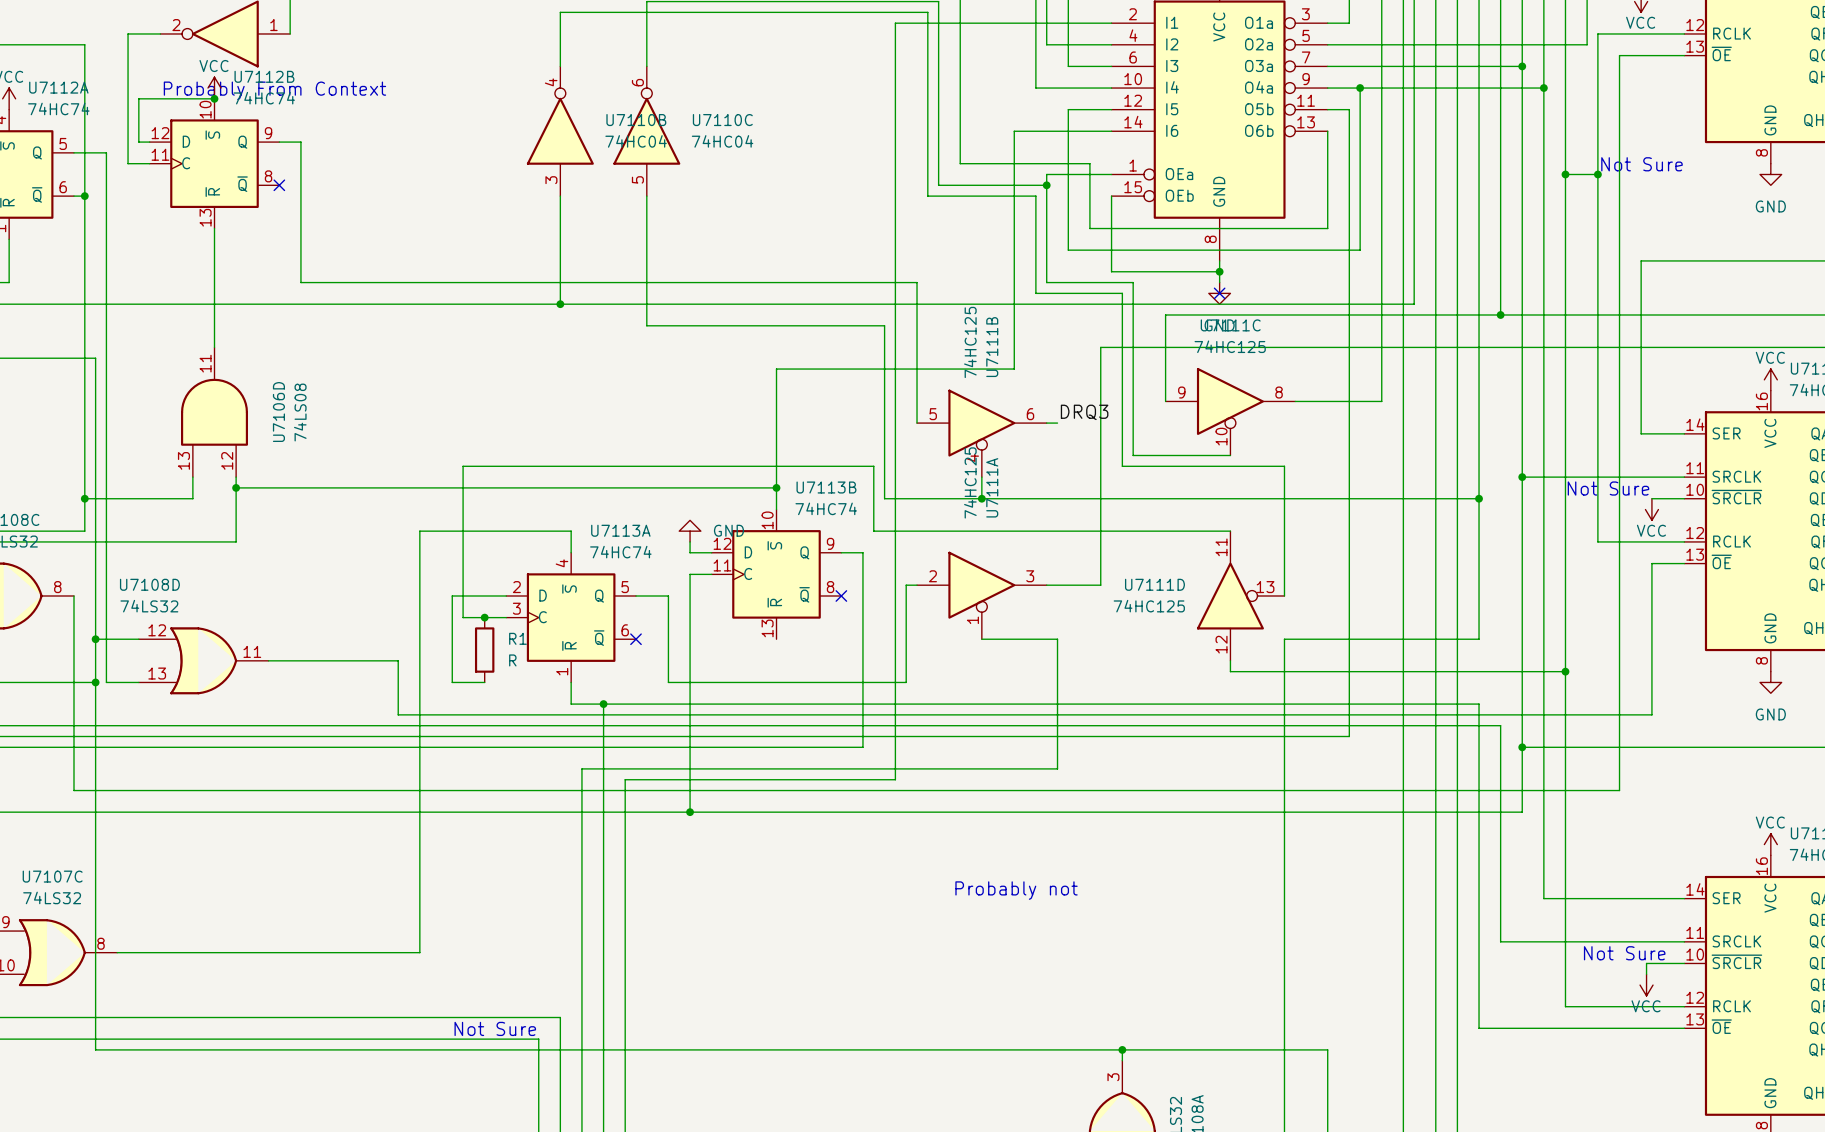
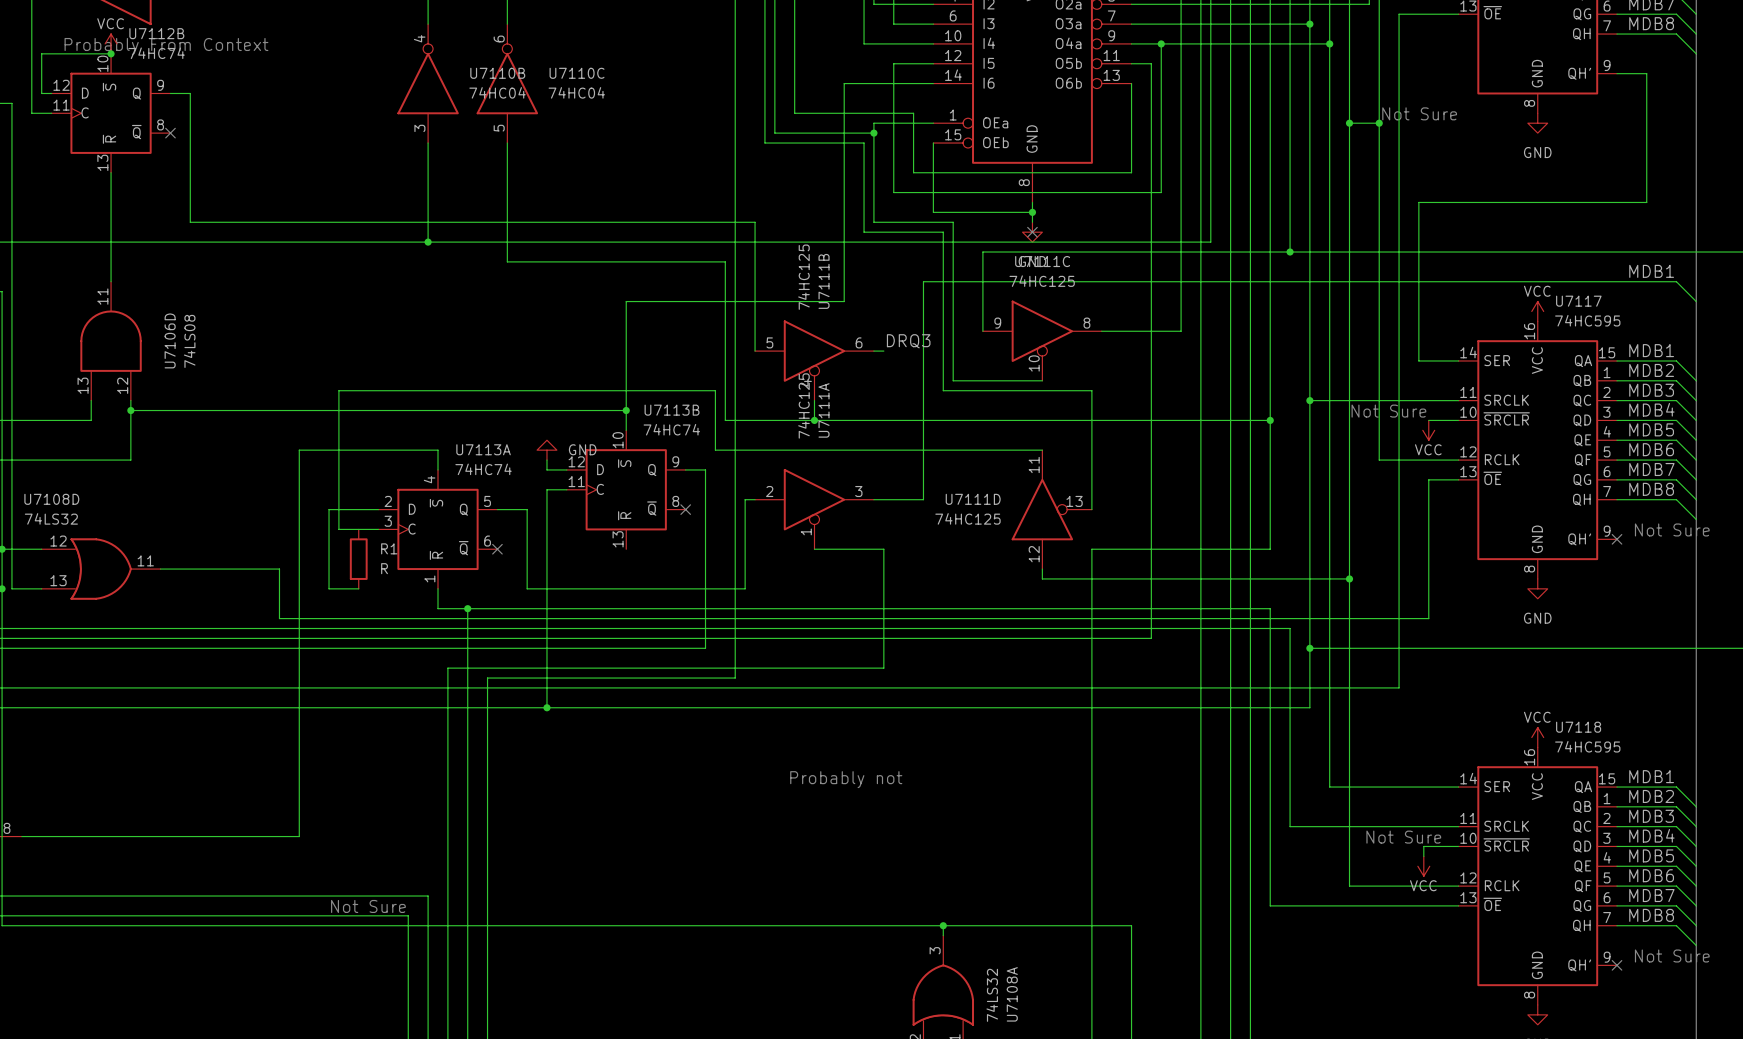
junction: (484, 617) -> none

